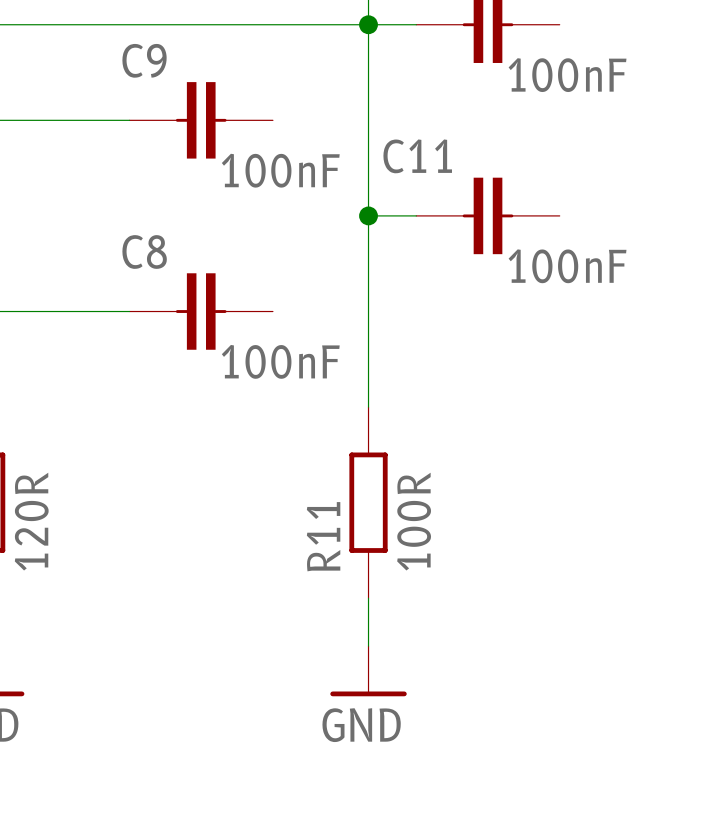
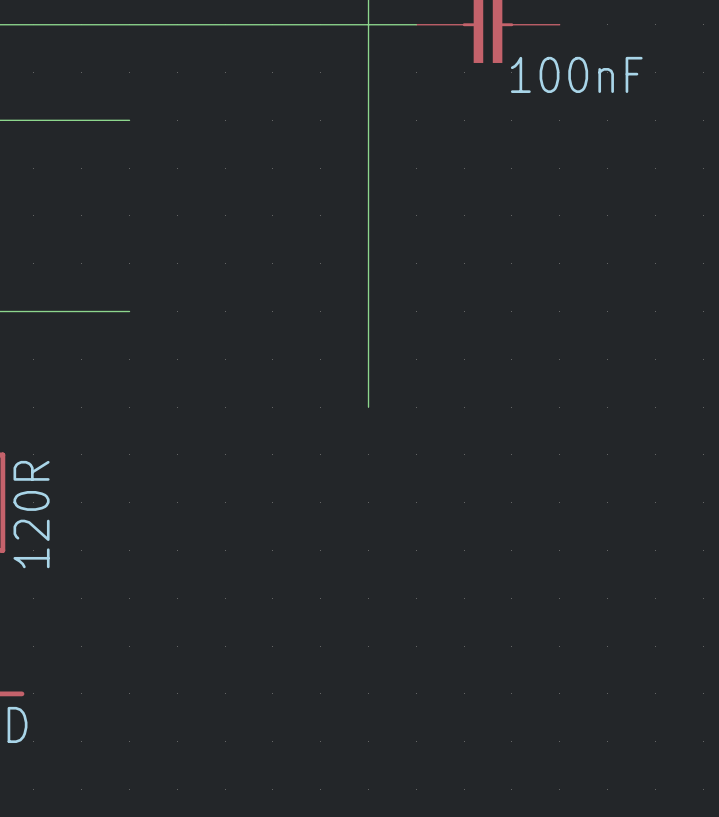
junction: (368, 24) -> none
C9: 100nF (201, 120) -> none
wire: (368, 215) (416, 215) -> none
junction: (368, 215) -> none
C11: 100nF (488, 215) -> none
C8: 100nF (201, 311) -> none
R11: 100R (368, 502) -> none
wire: (368, 598) (368, 646) -> none
power symbol: GND (368, 671) -> none

